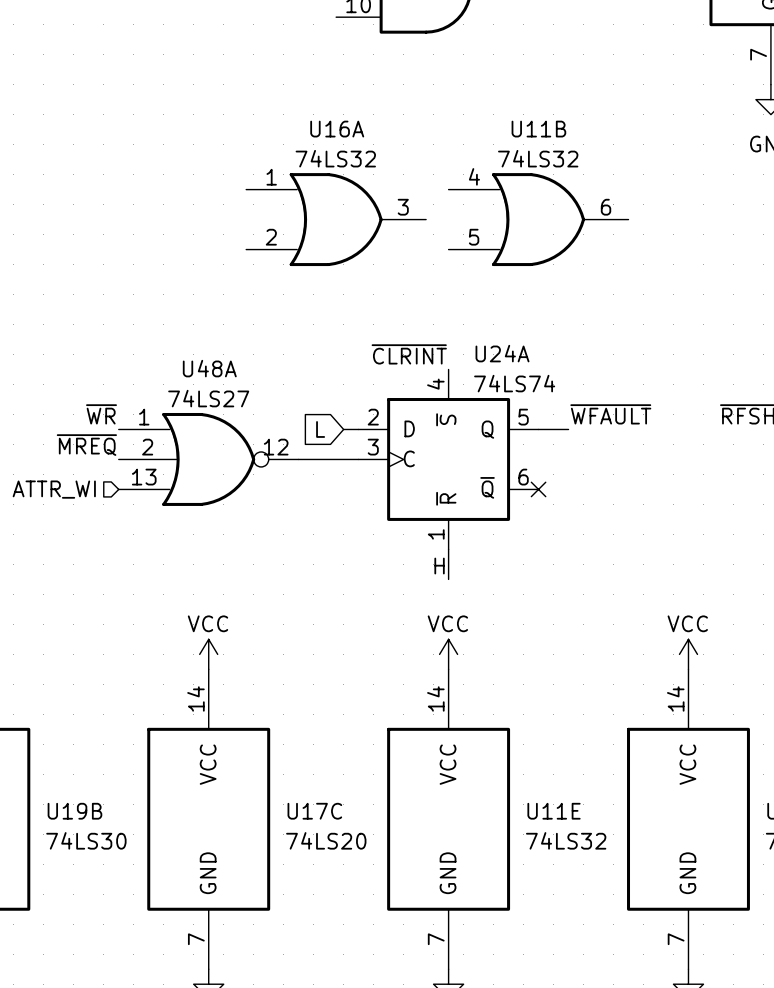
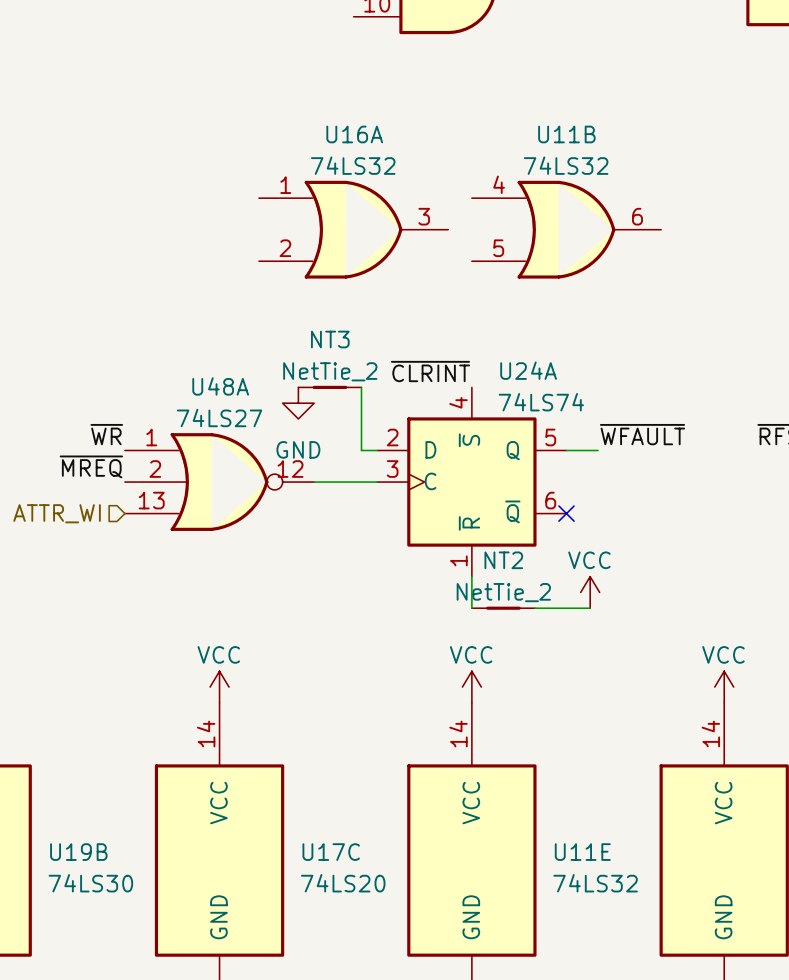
NT3: none -> NetTie_2 (329, 387)
wire: none -> (361, 387) (361, 450)
power symbol: none -> GND (298, 403)
global label: L (320, 429) -> none
power symbol: none -> VCC (590, 592)
label: H (439, 566) -> none
NT2: none -> NetTie_2 (503, 608)
wire: none -> (534, 608) (590, 608)

